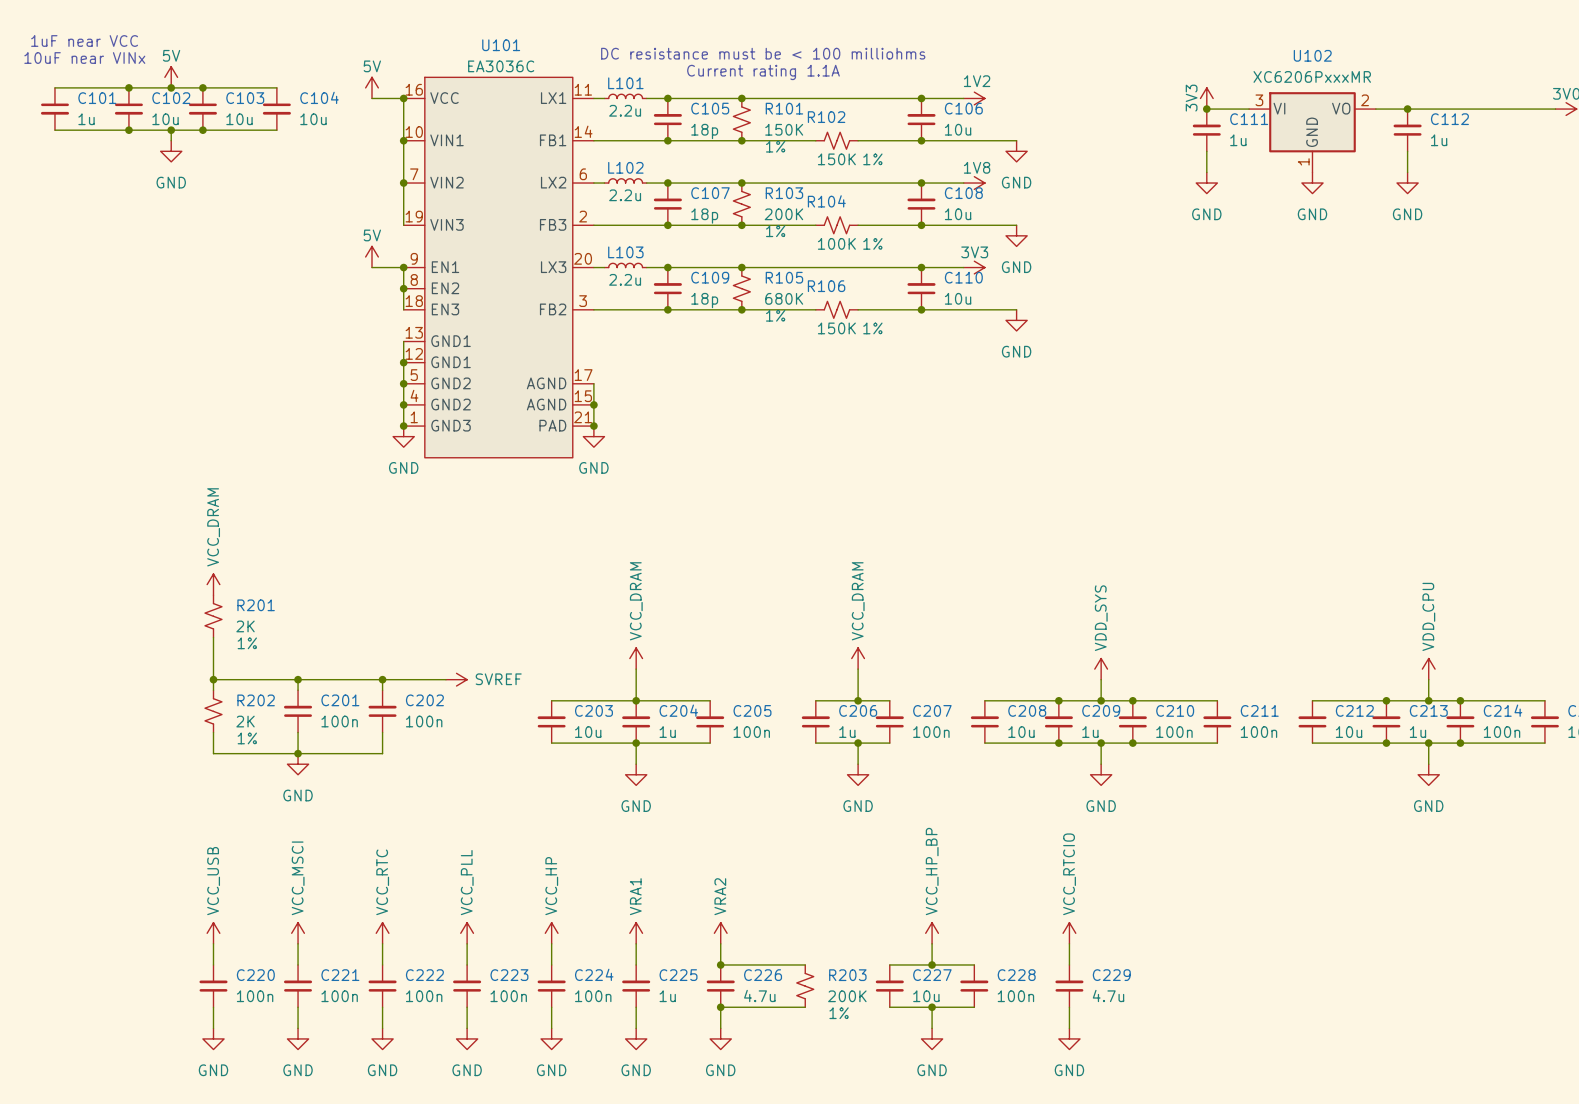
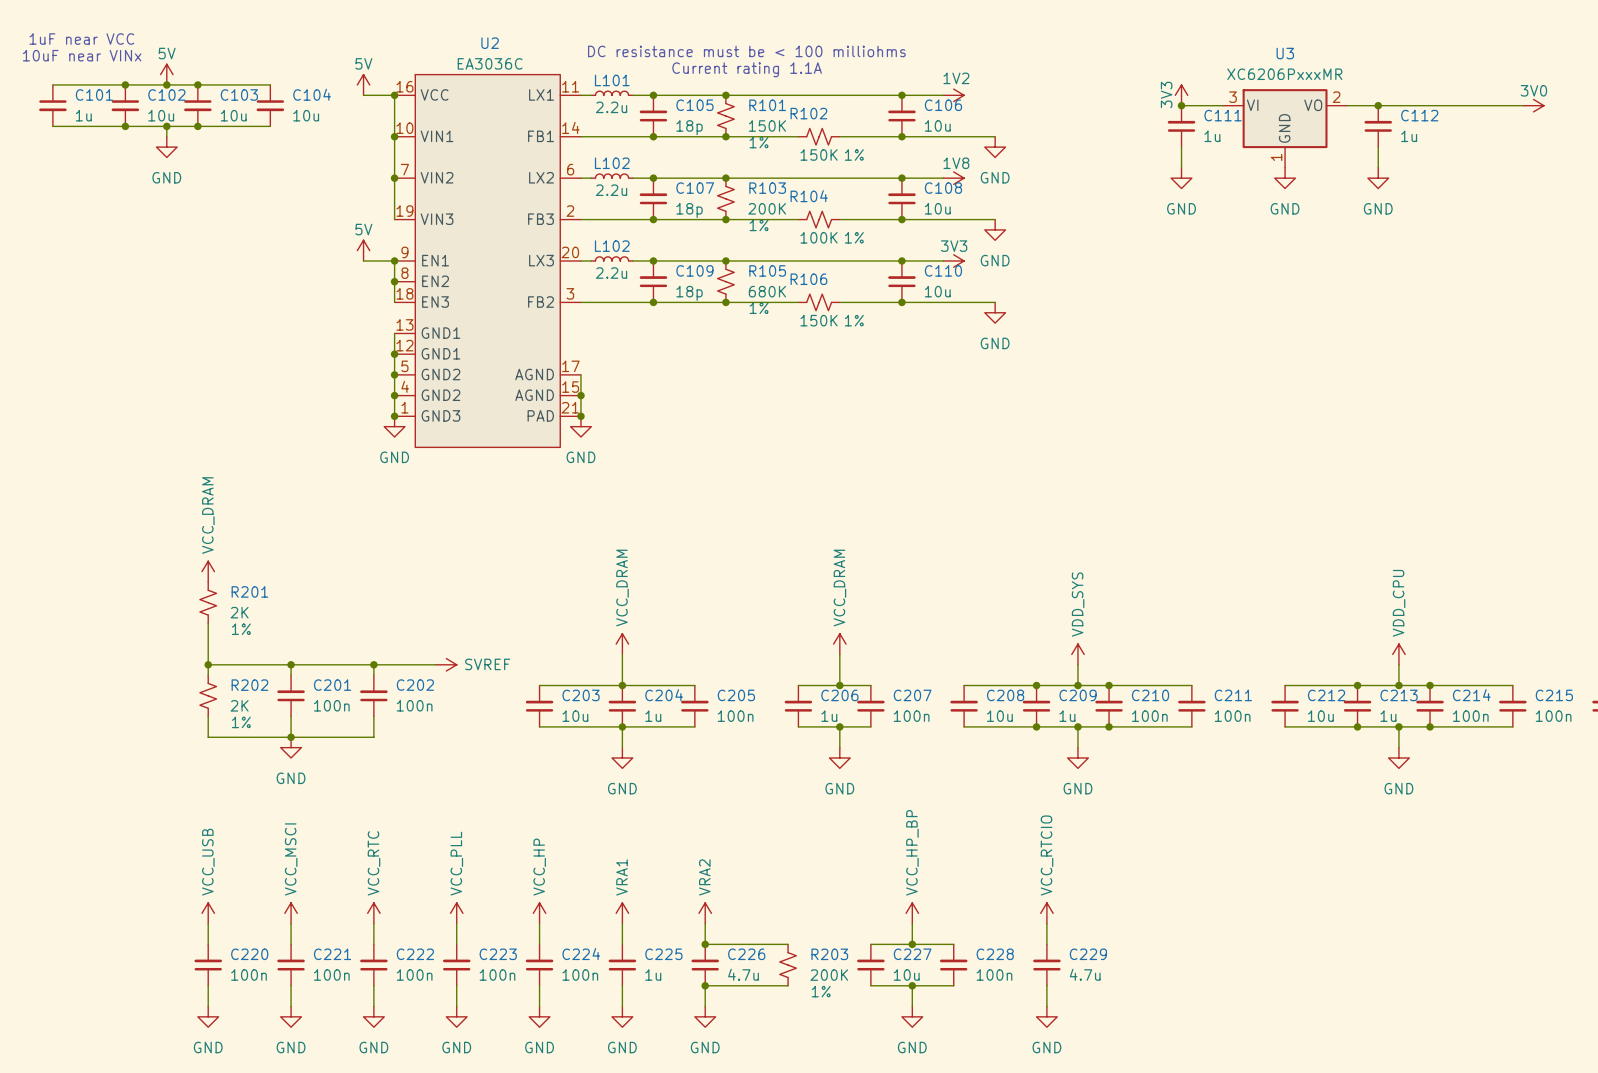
U101 name: U101 (501, 45) -> U2 (490, 43)
U102 name: U102 (1312, 55) -> U3 (1285, 53)
L103 name: L103 (625, 252) -> L102 (612, 246)

